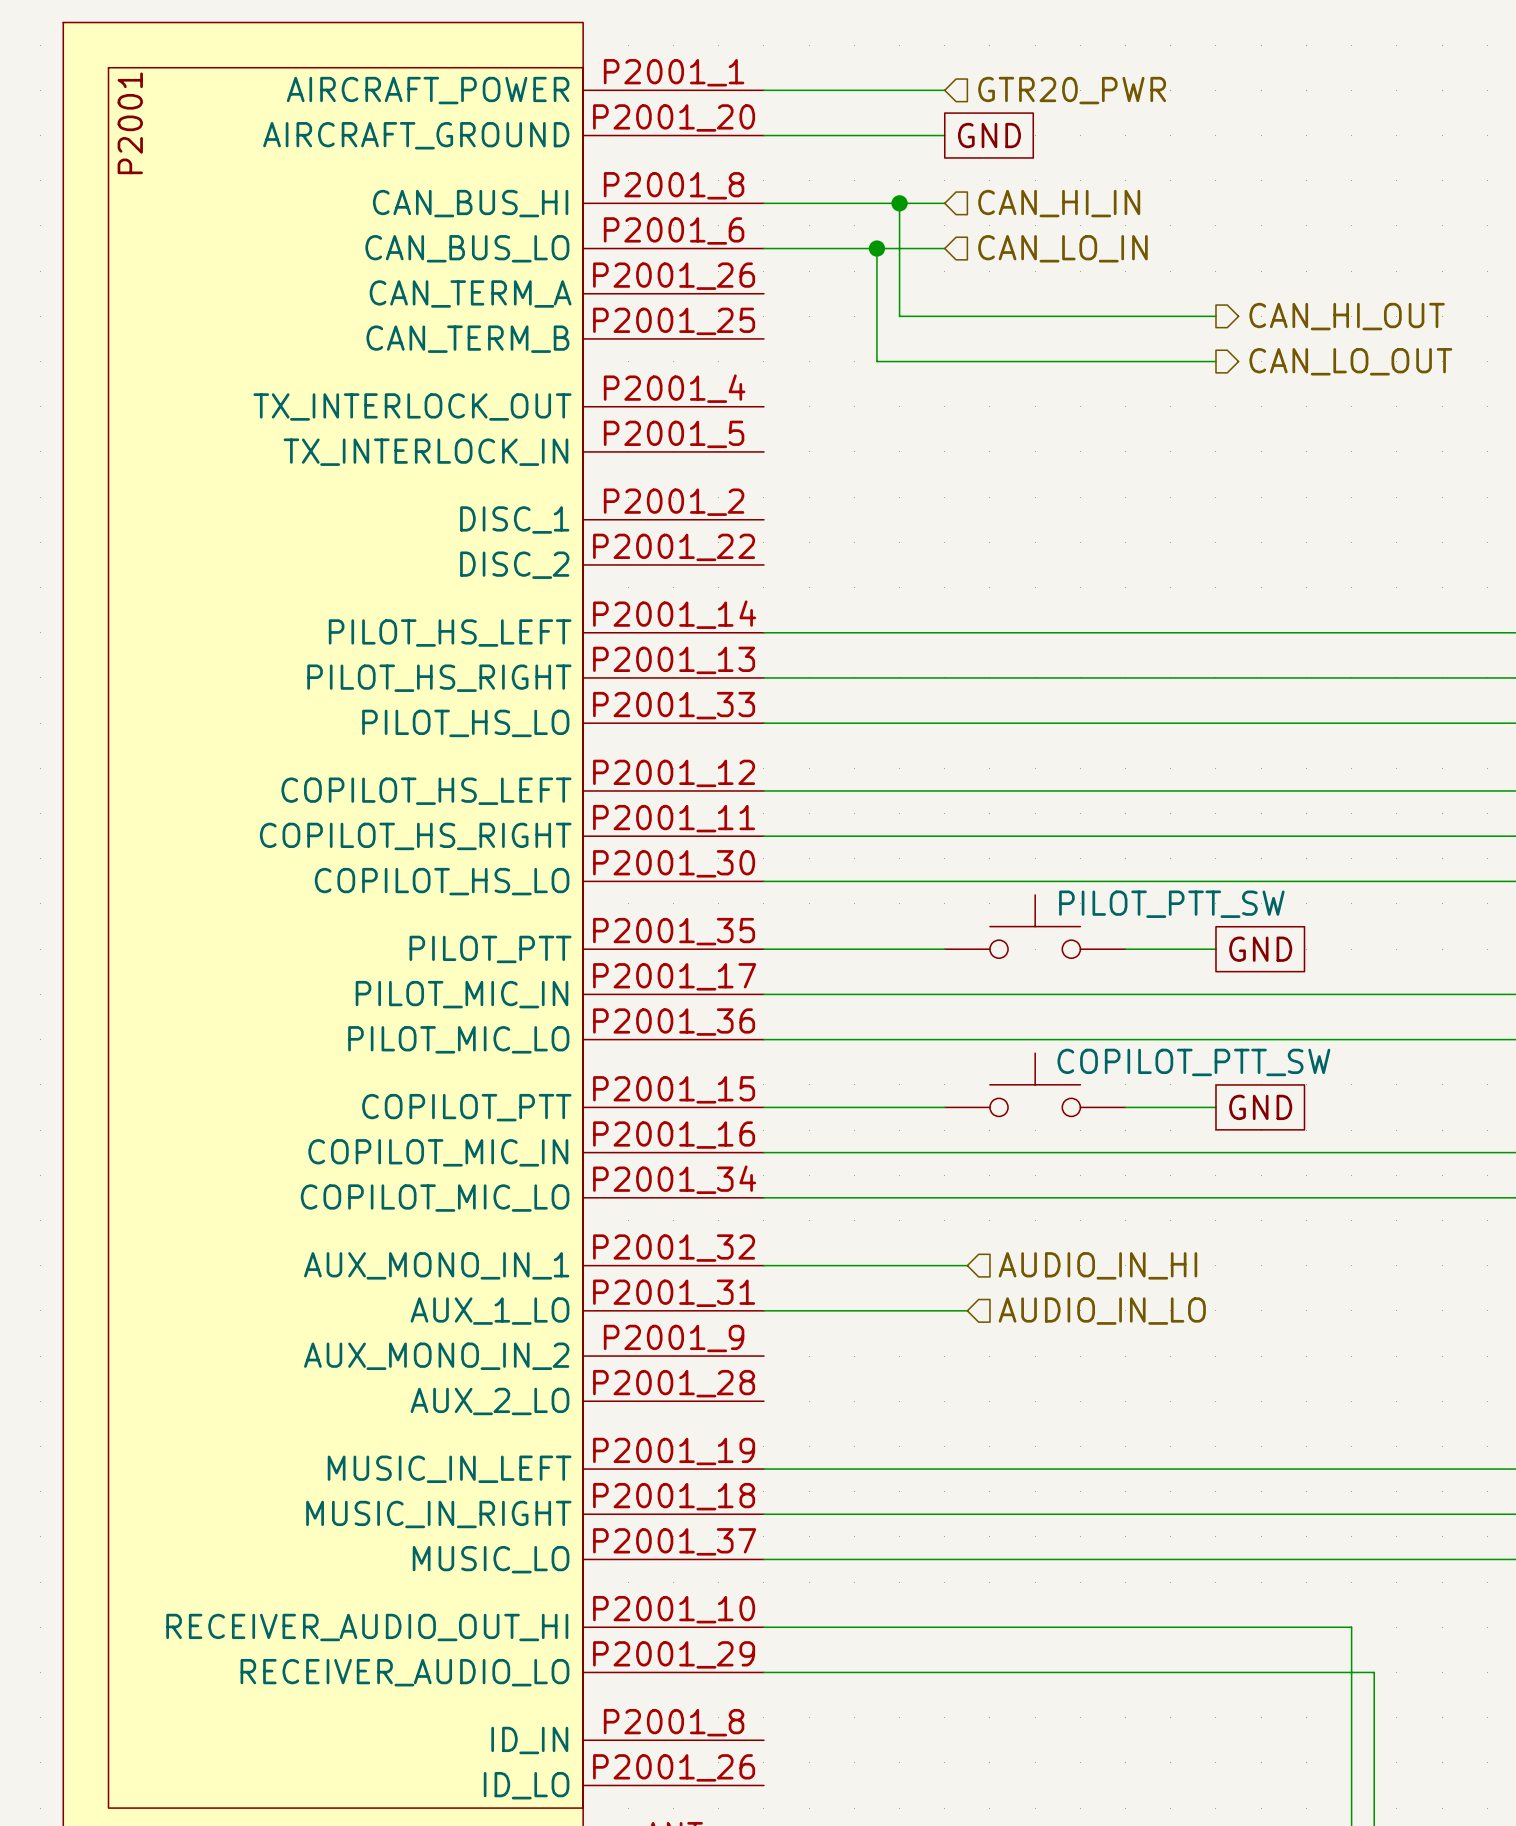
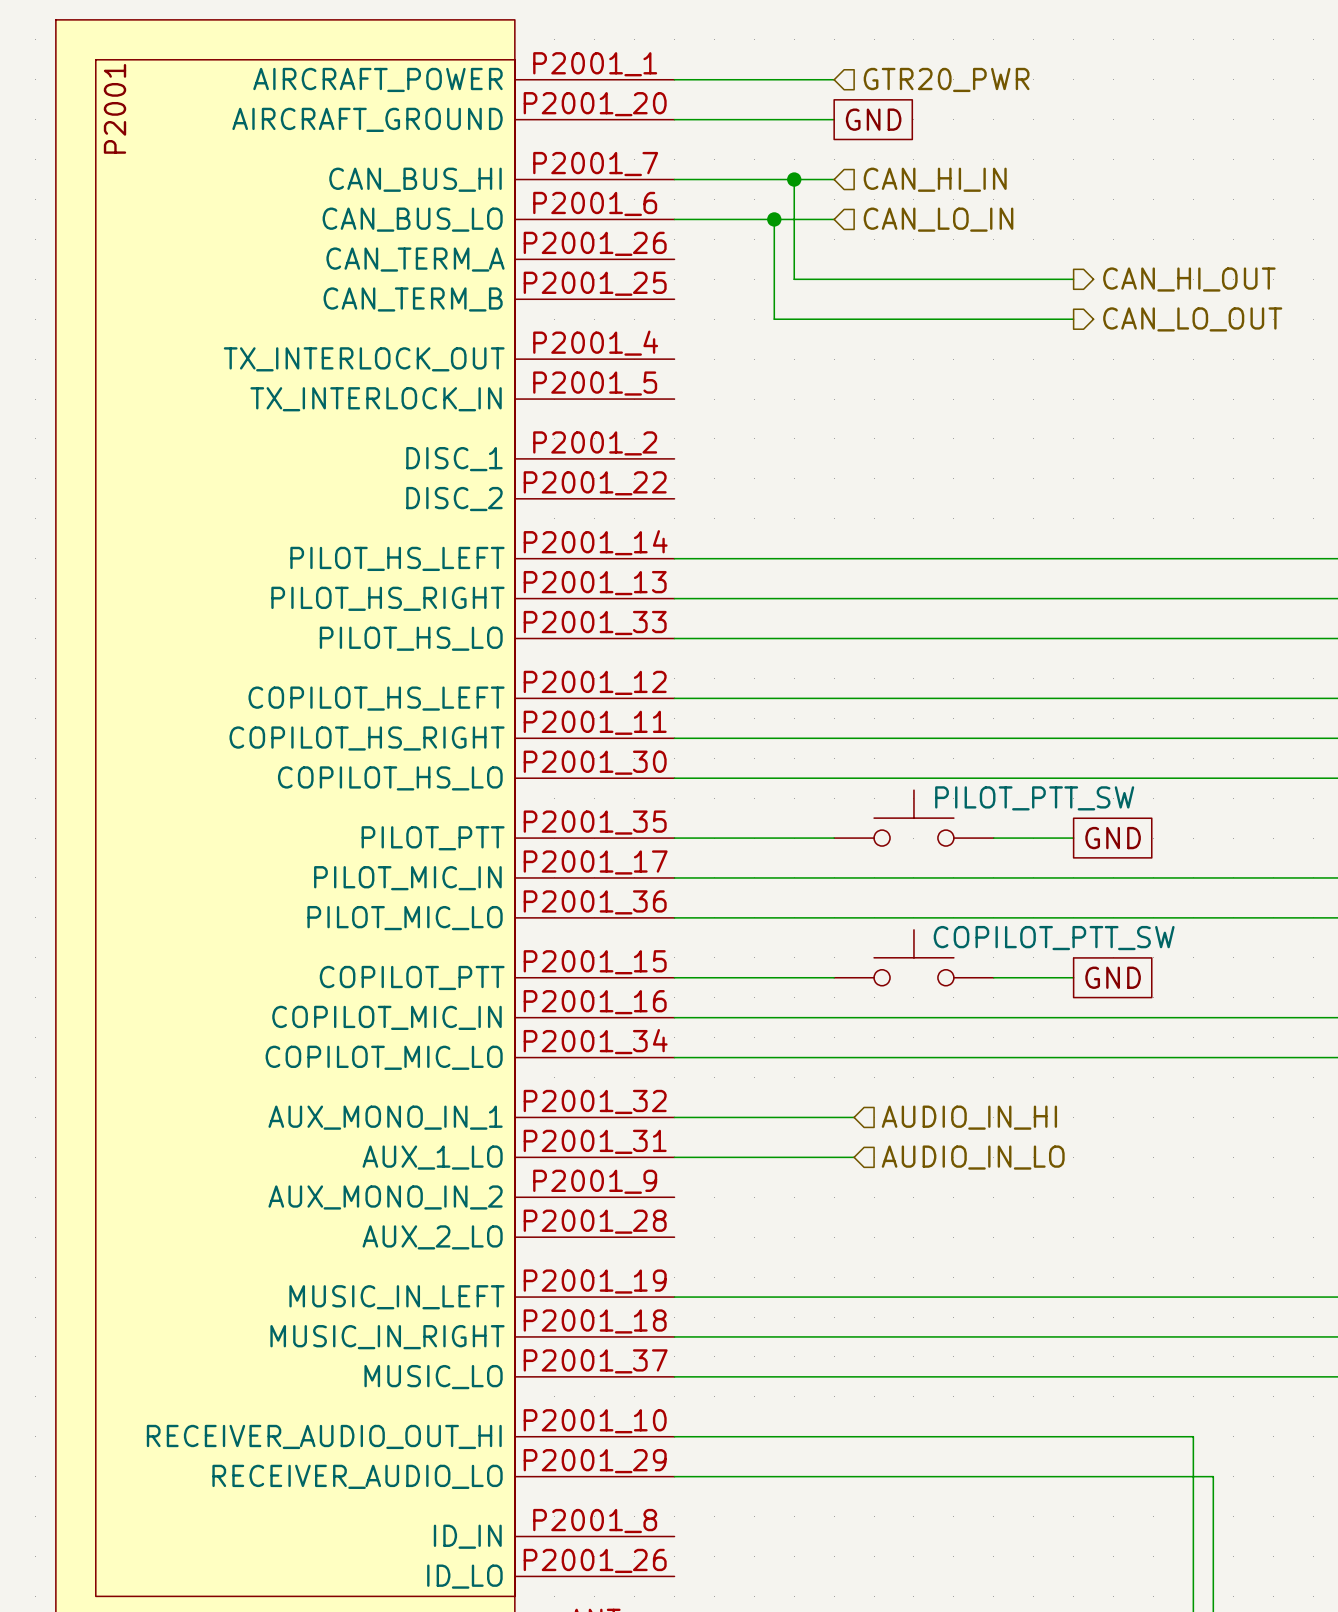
part pin number: P2001_8 (674, 185) -> P2001_7 (595, 164)

